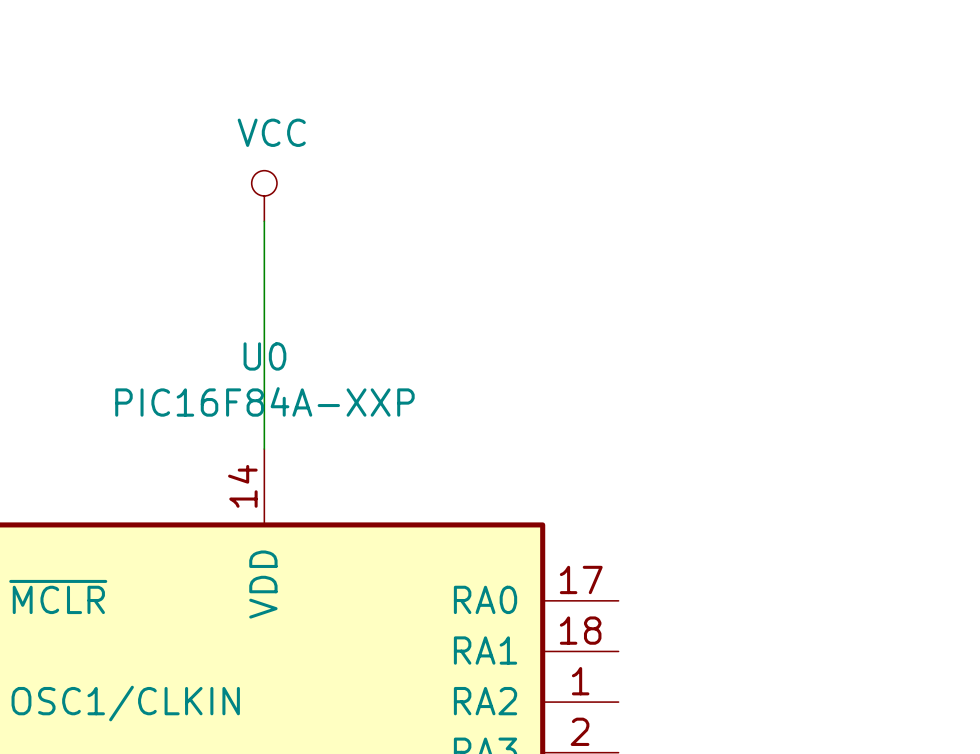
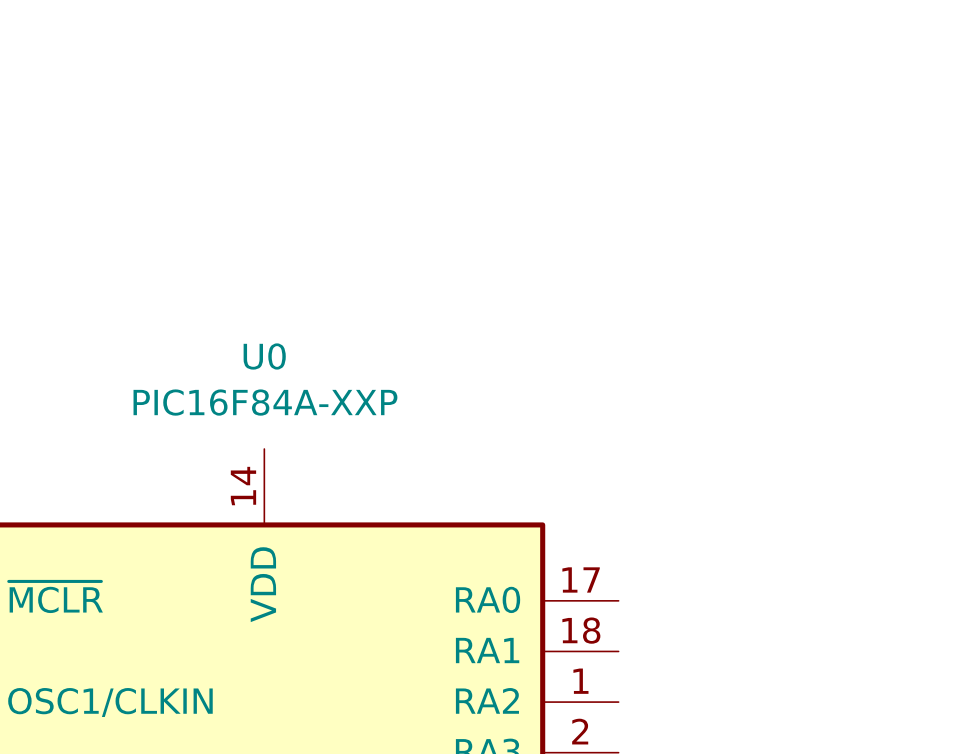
power symbol: VCC (264, 195) -> none
wire: (264, 221) (264, 449) -> none

